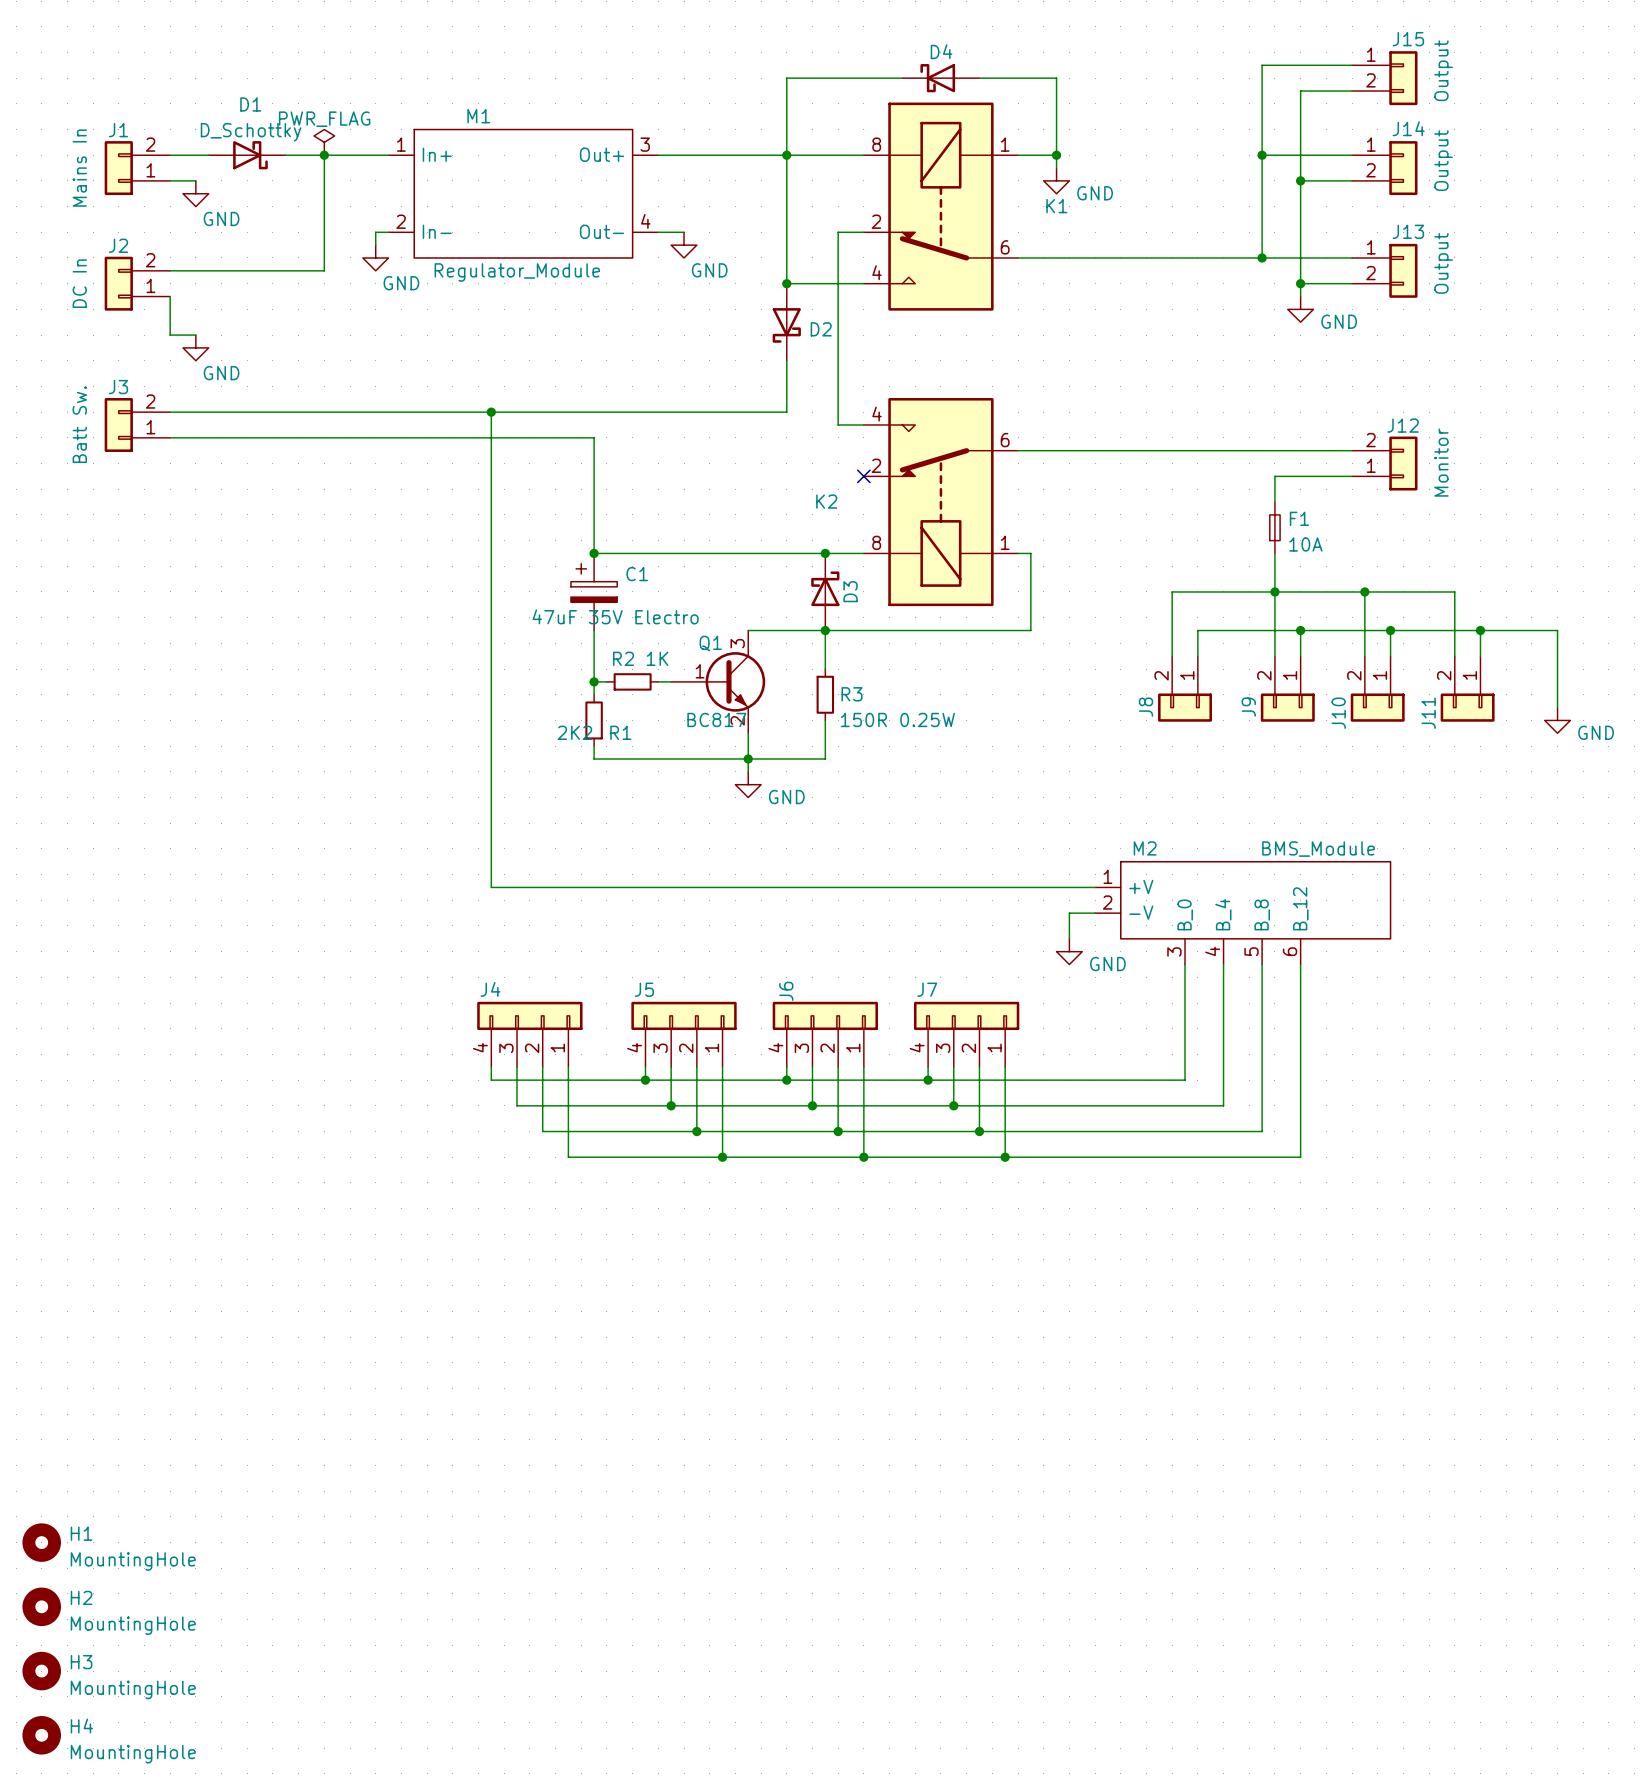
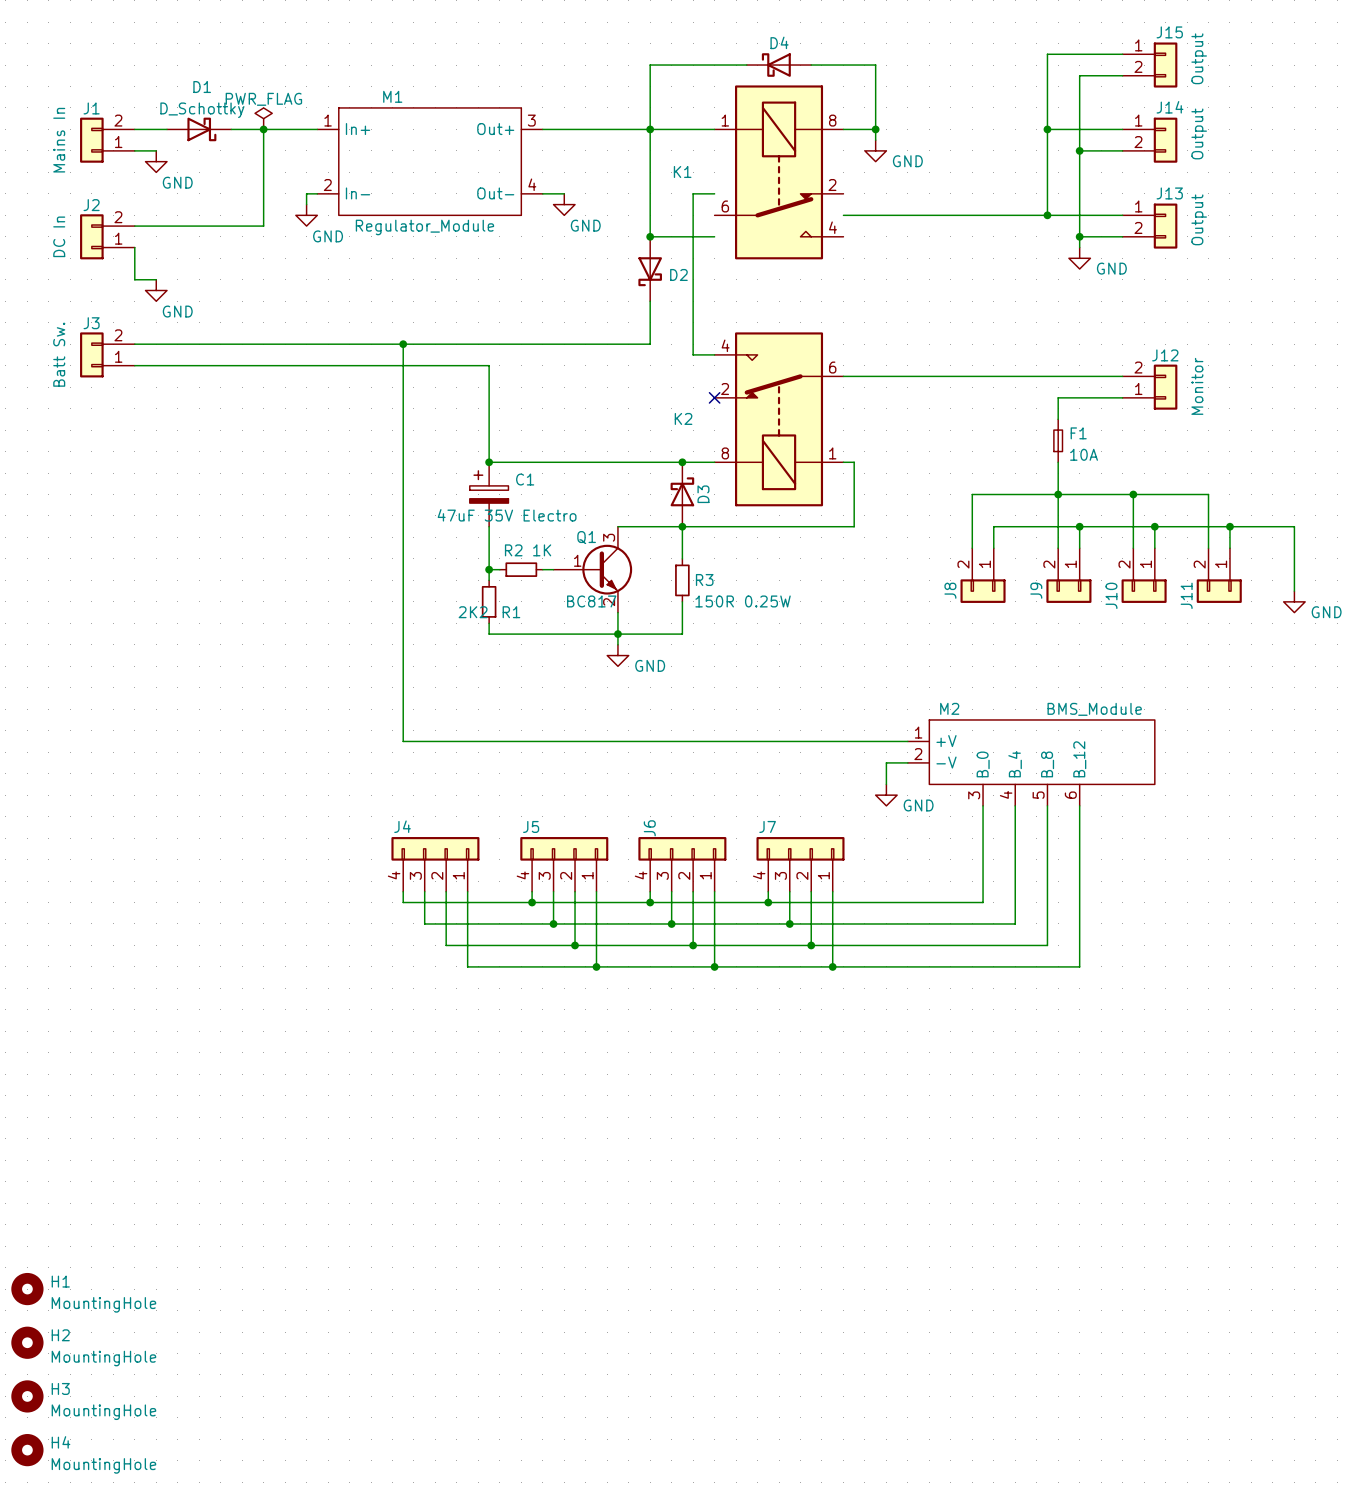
K1 flip: as is (940, 206) -> left-right (779, 172)

